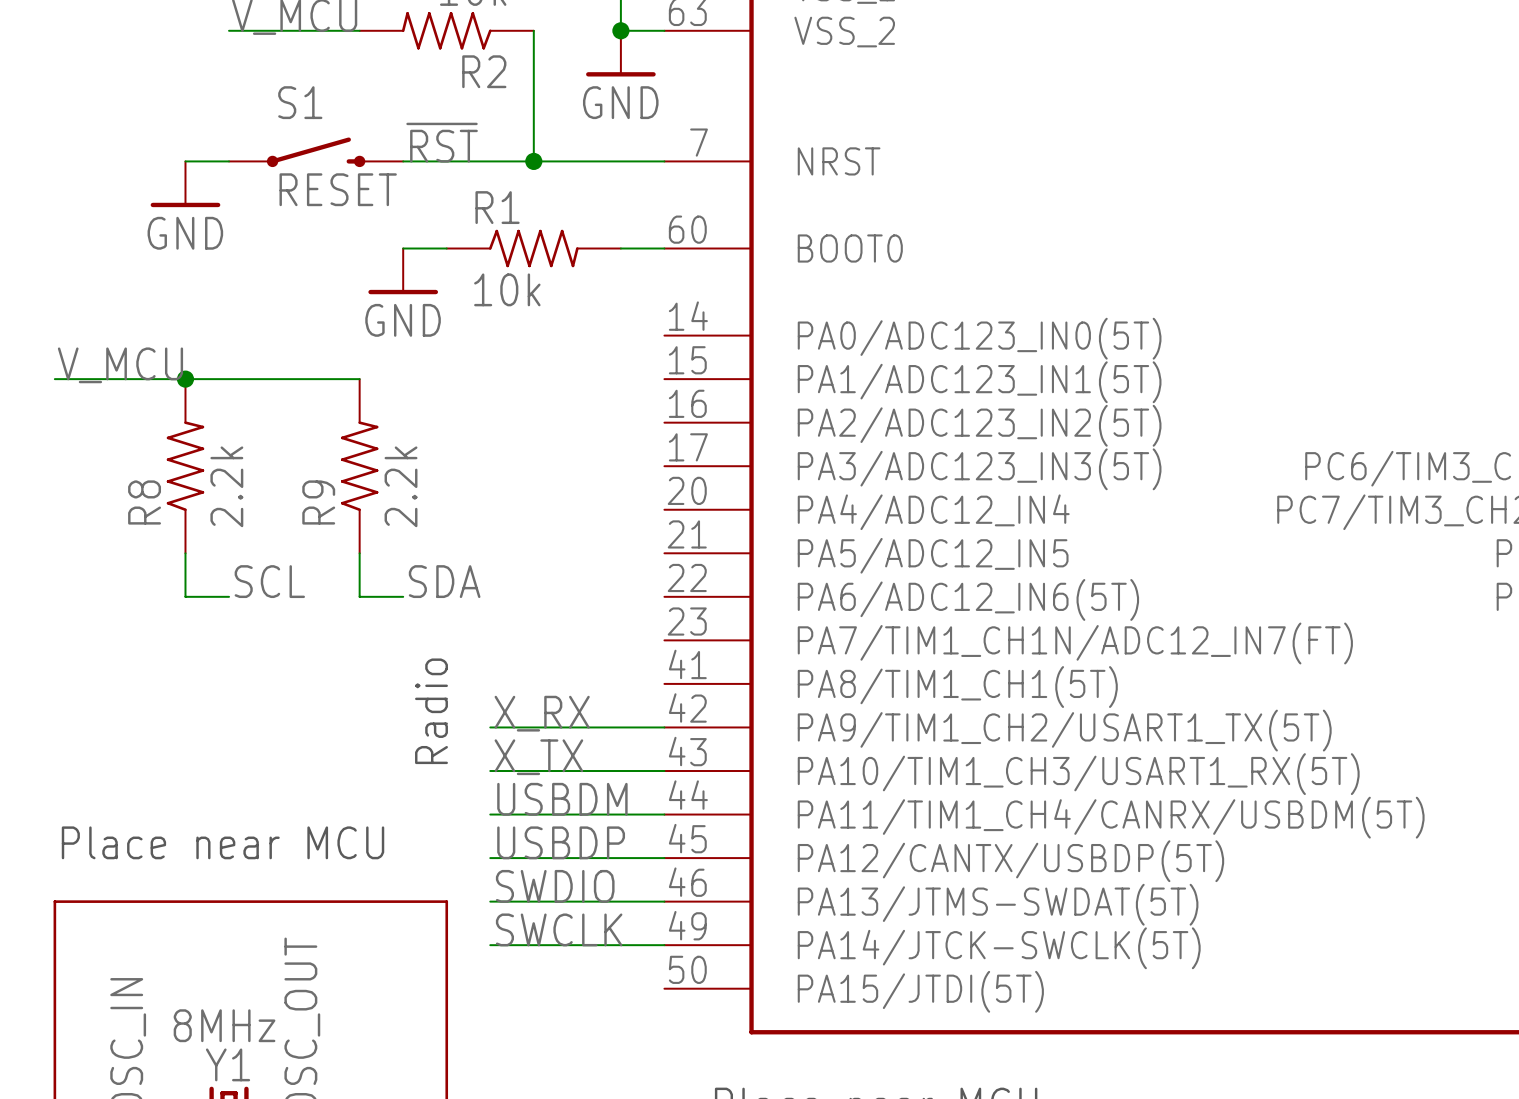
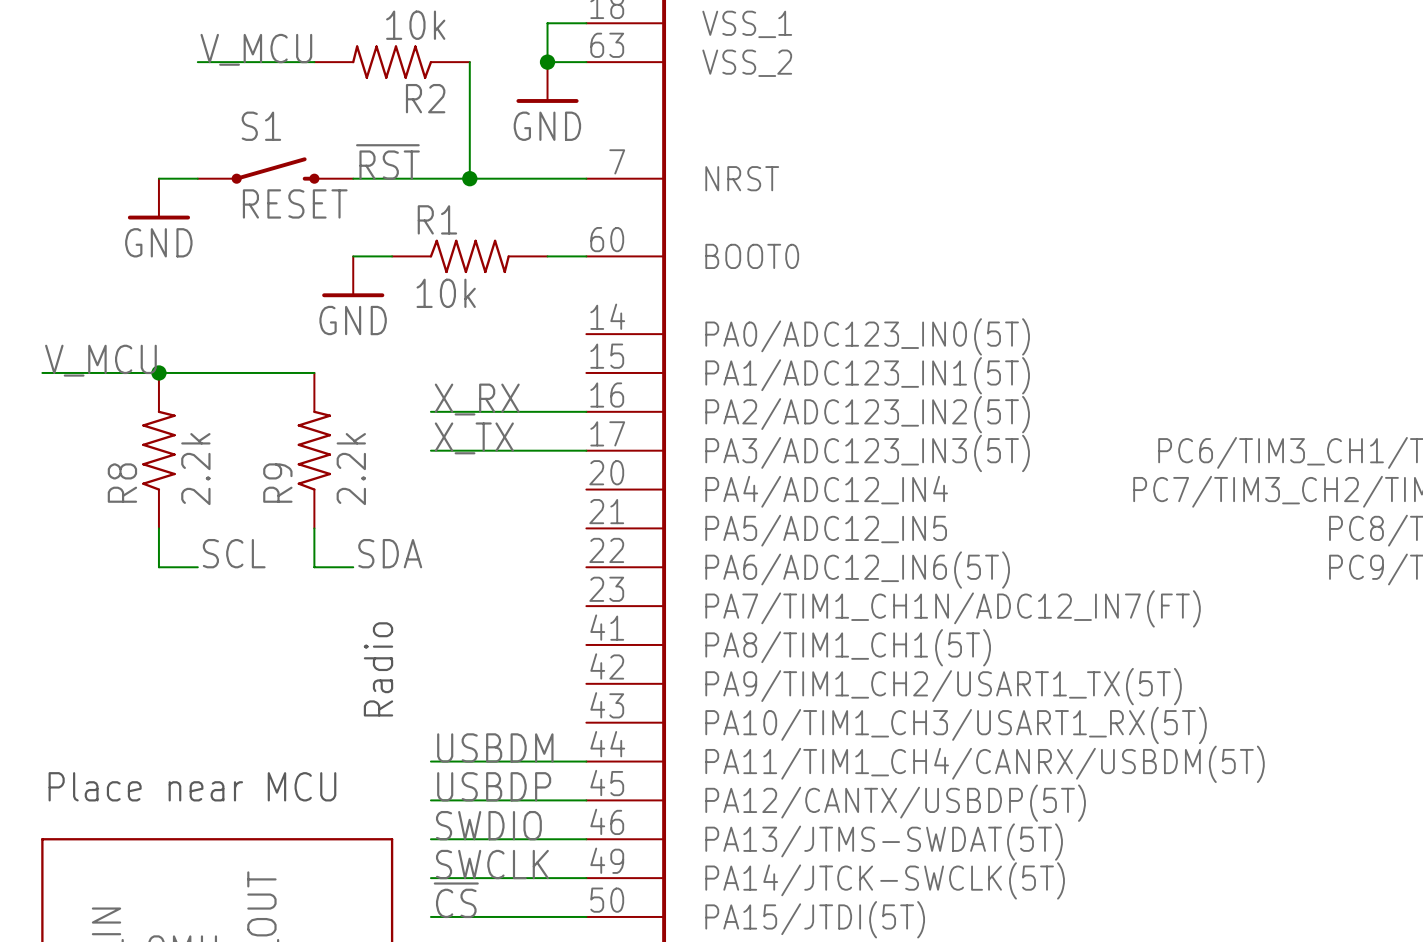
wire: none -> (430, 411) (586, 411)
label position: X_RX (542, 713) -> X_RX (477, 399)
wire: (490, 727) (664, 727) -> (430, 450) (586, 450)
label position: X_TX (538, 757) -> X_TX (474, 438)
wire: (490, 771) (664, 771) -> (430, 916) (586, 916)
label: none -> ~{CS} (456, 900)

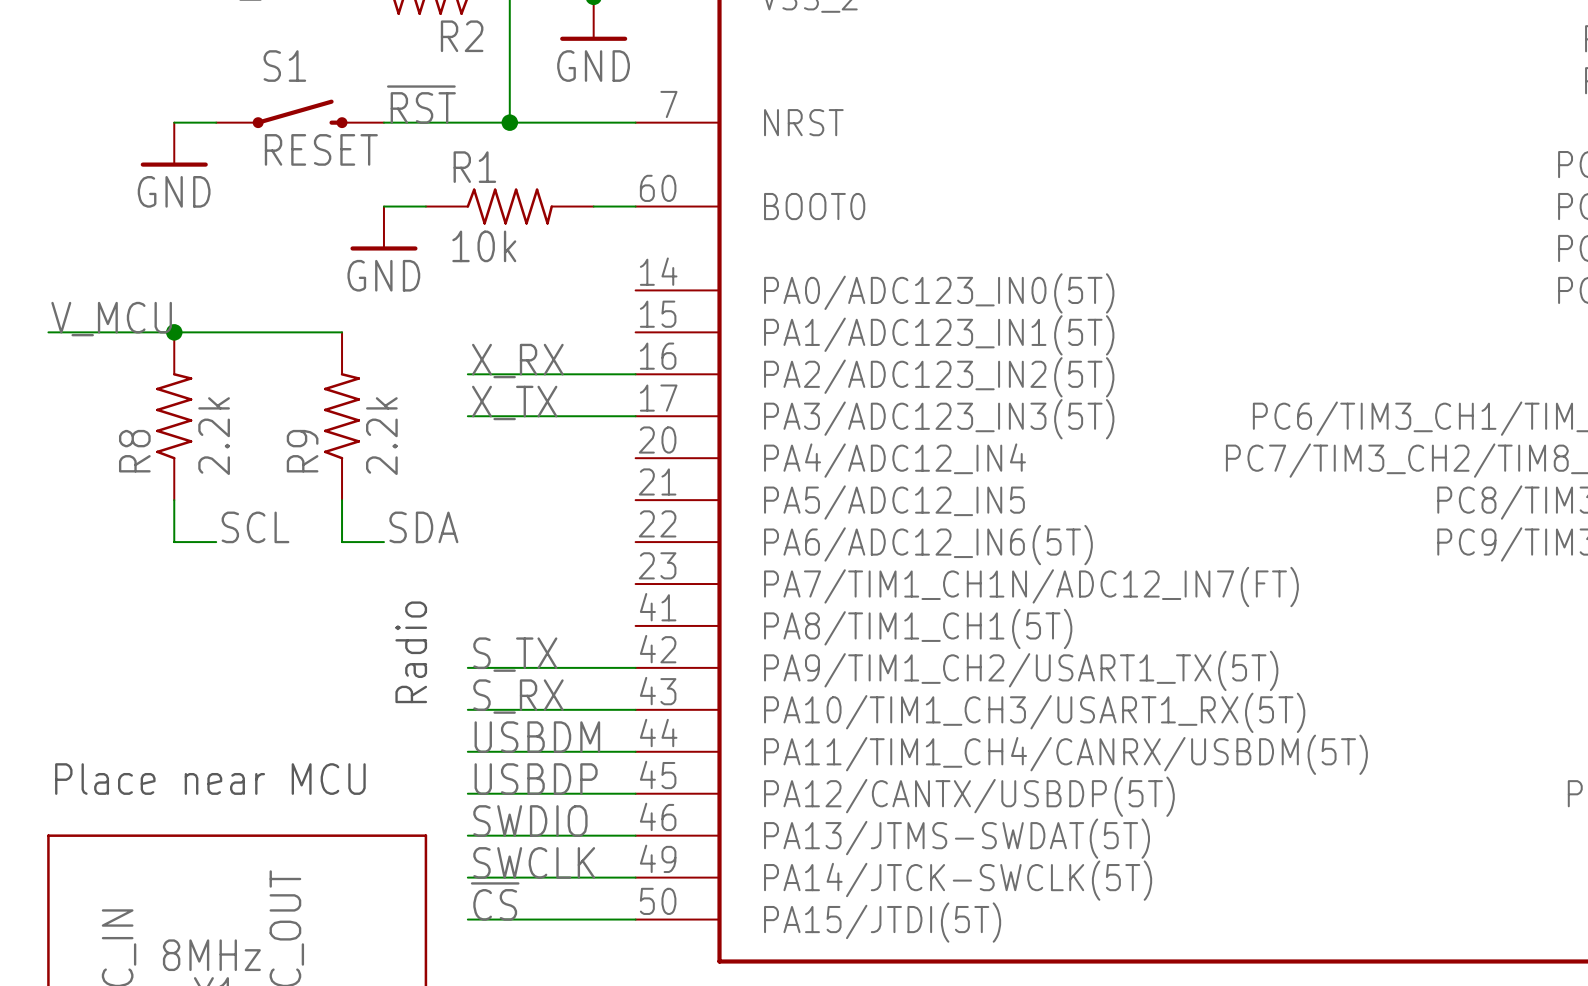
label: none -> S_TX (515, 654)
wire: none -> (467, 667) (635, 667)
label: none -> S_RX (518, 696)
wire: none -> (467, 709) (635, 709)

